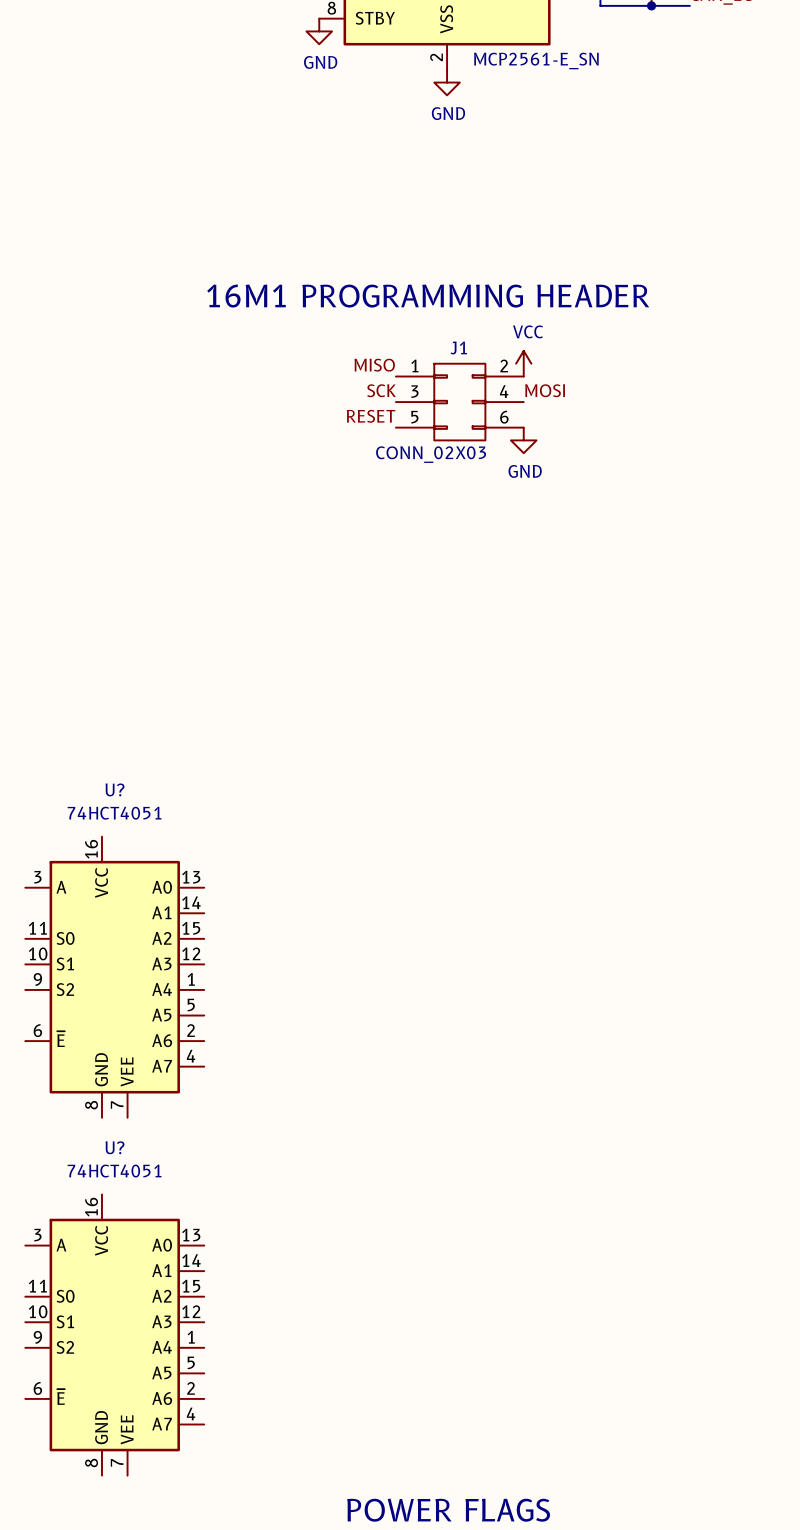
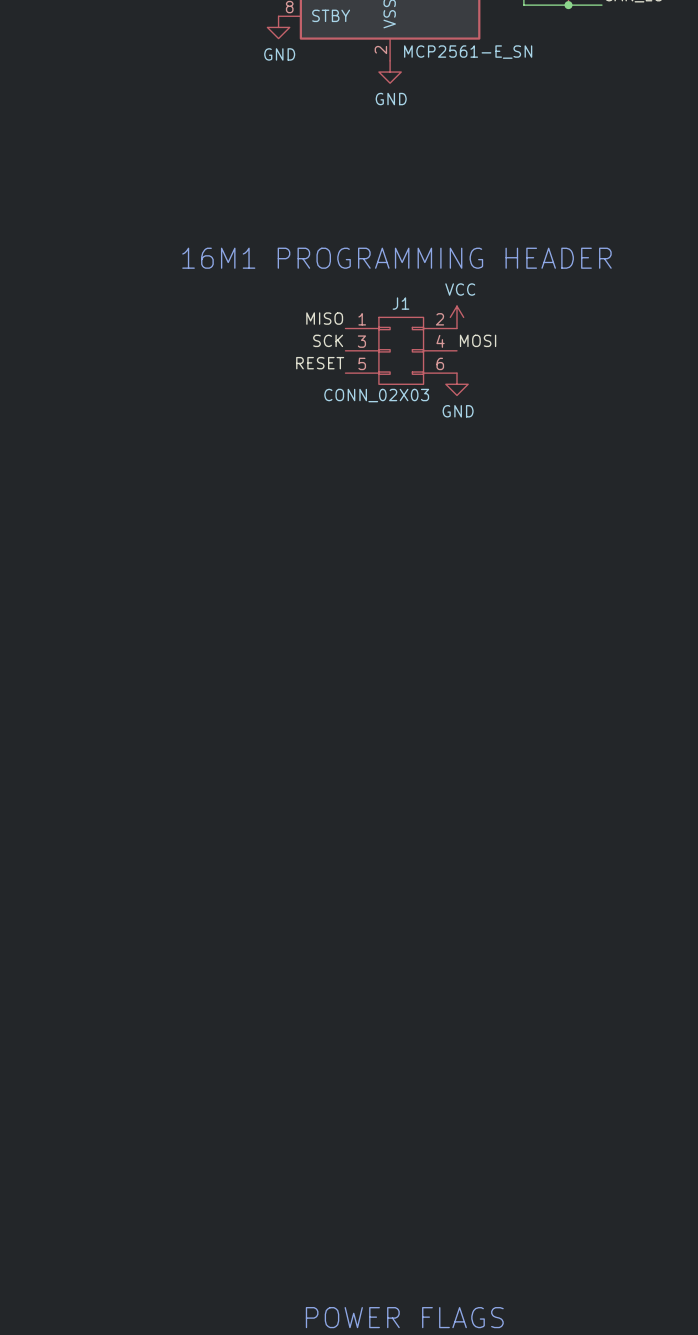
U?: 74HCT4051 (114, 977) -> none
U?: 74HCT4051 (114, 1335) -> none

